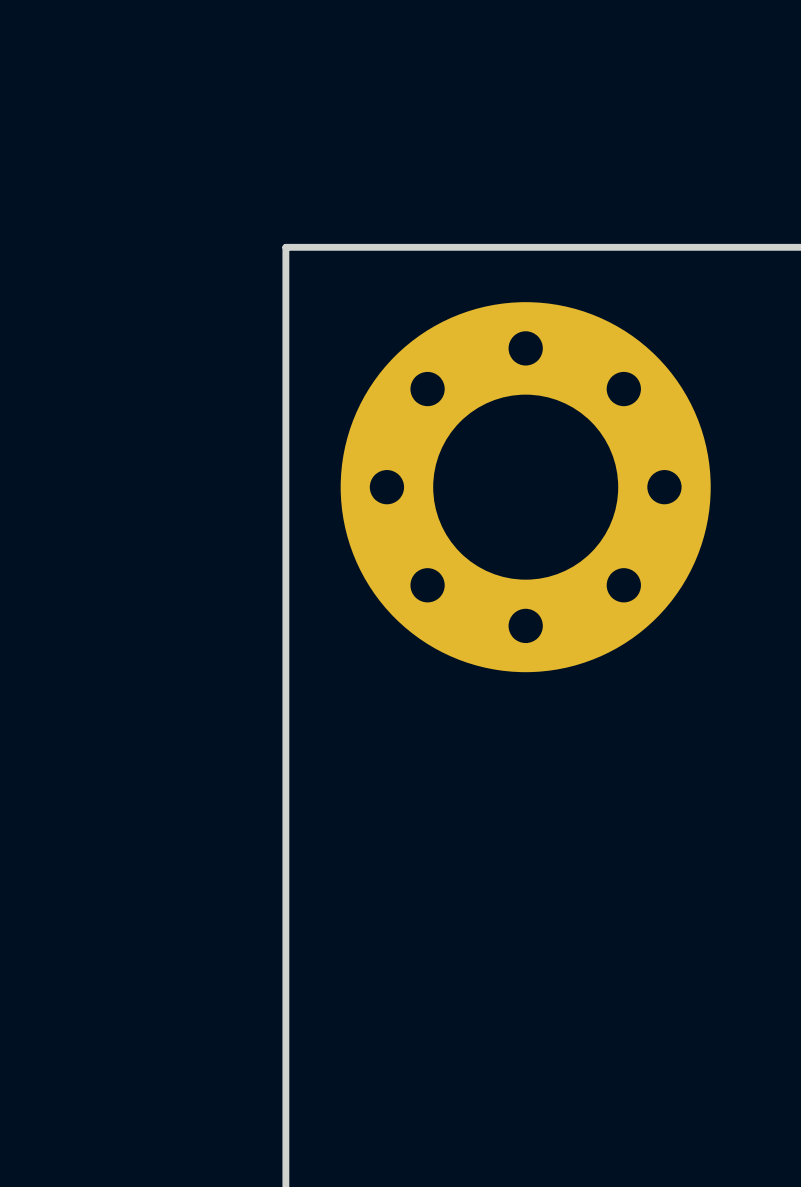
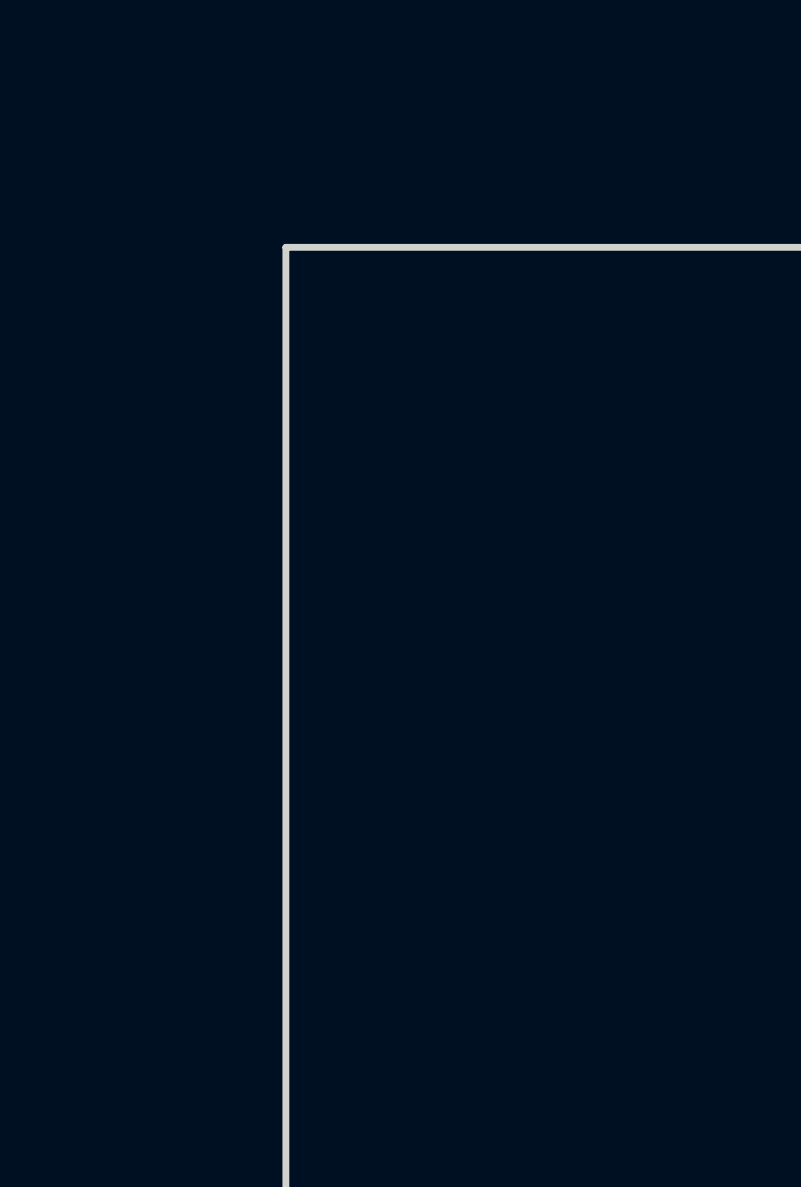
part: (525, 487) -> none

